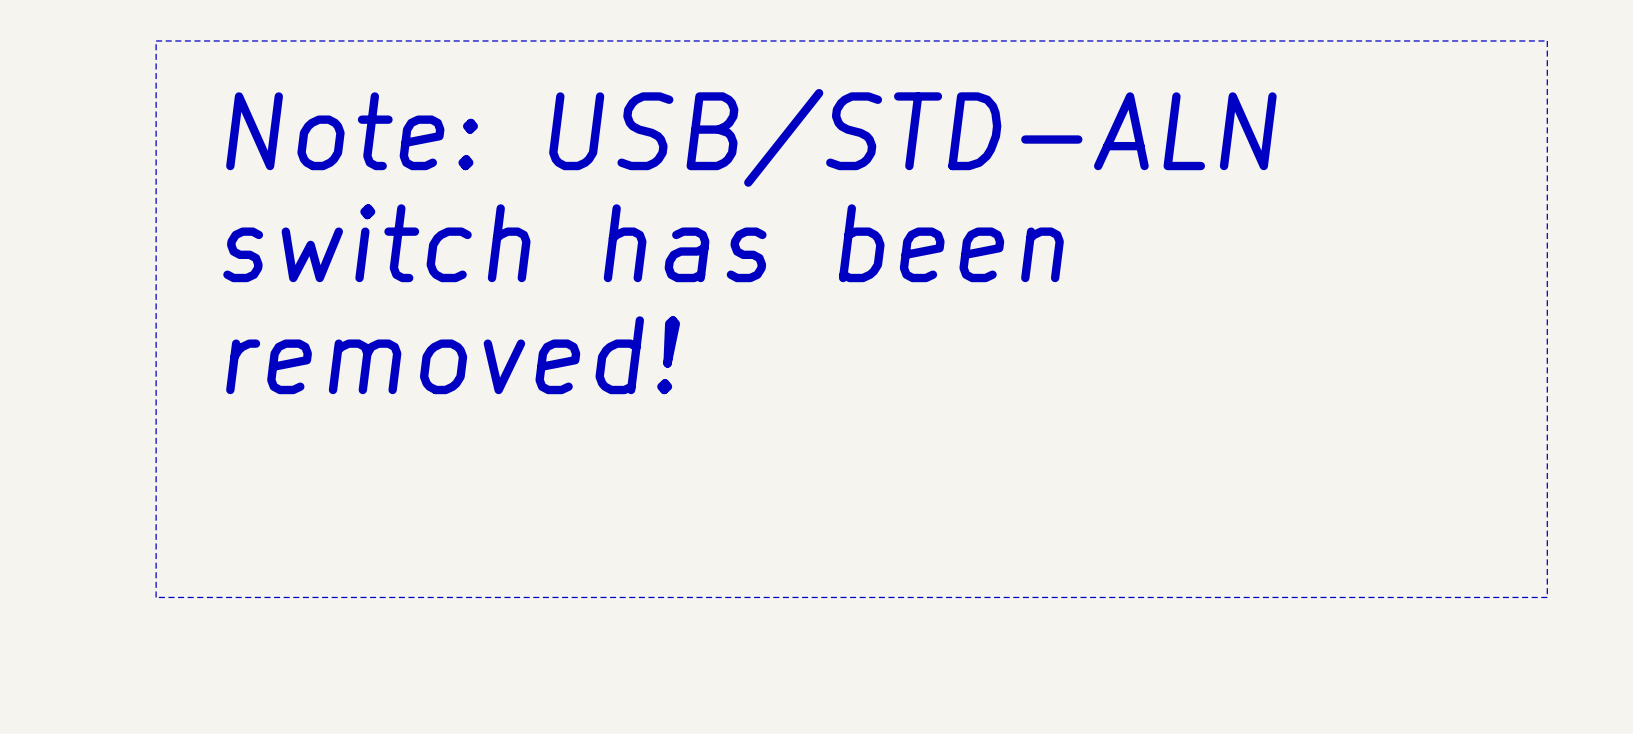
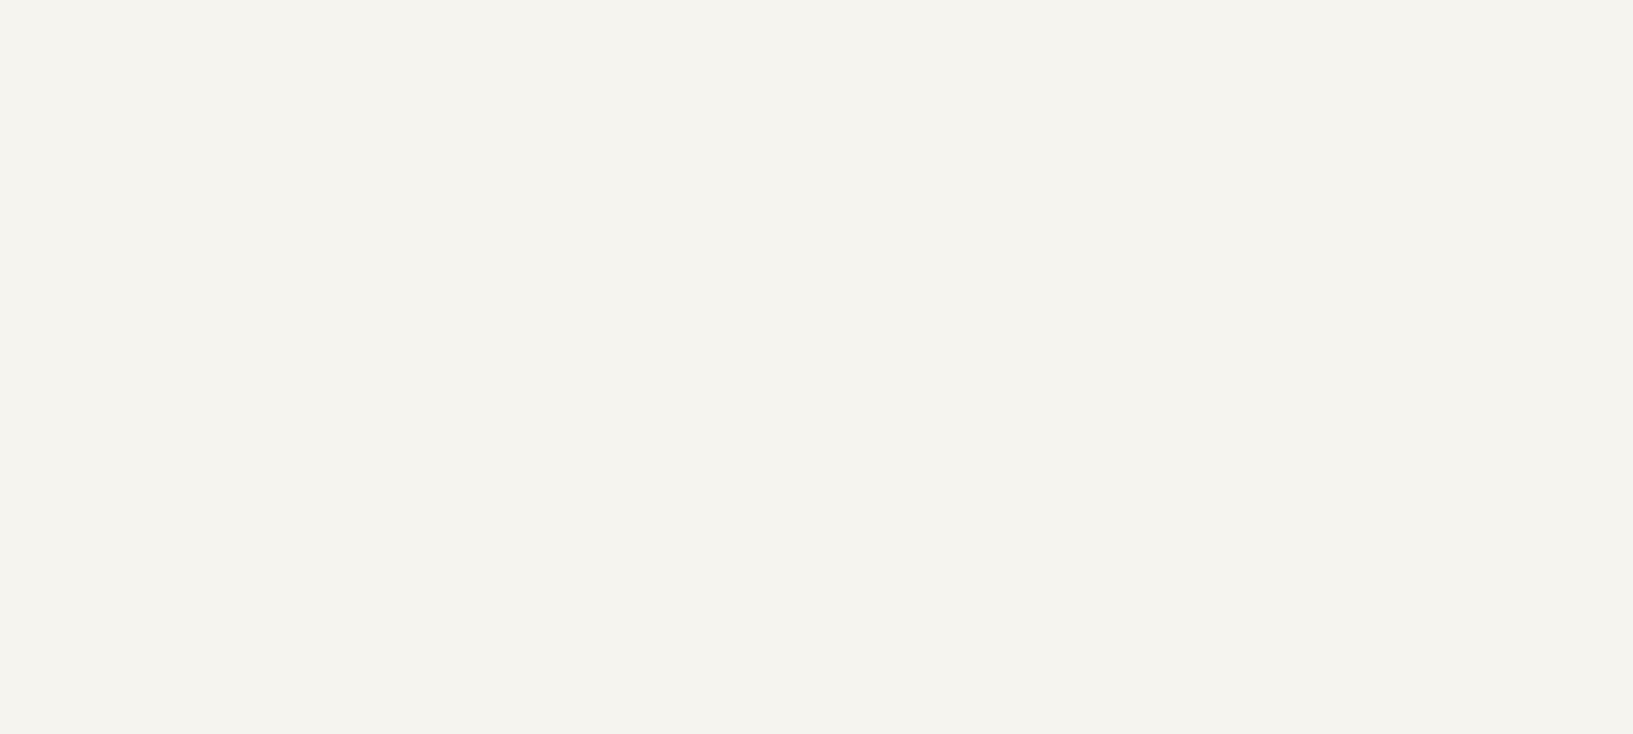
line: (156, 40) (1547, 40) (1547, 597) (156, 597) (156, 40) -> none
text: Note: USB/STD-ALN (751, 137) -> none
text: switch has been (643, 243) -> none
text: removed! (453, 355) -> none

